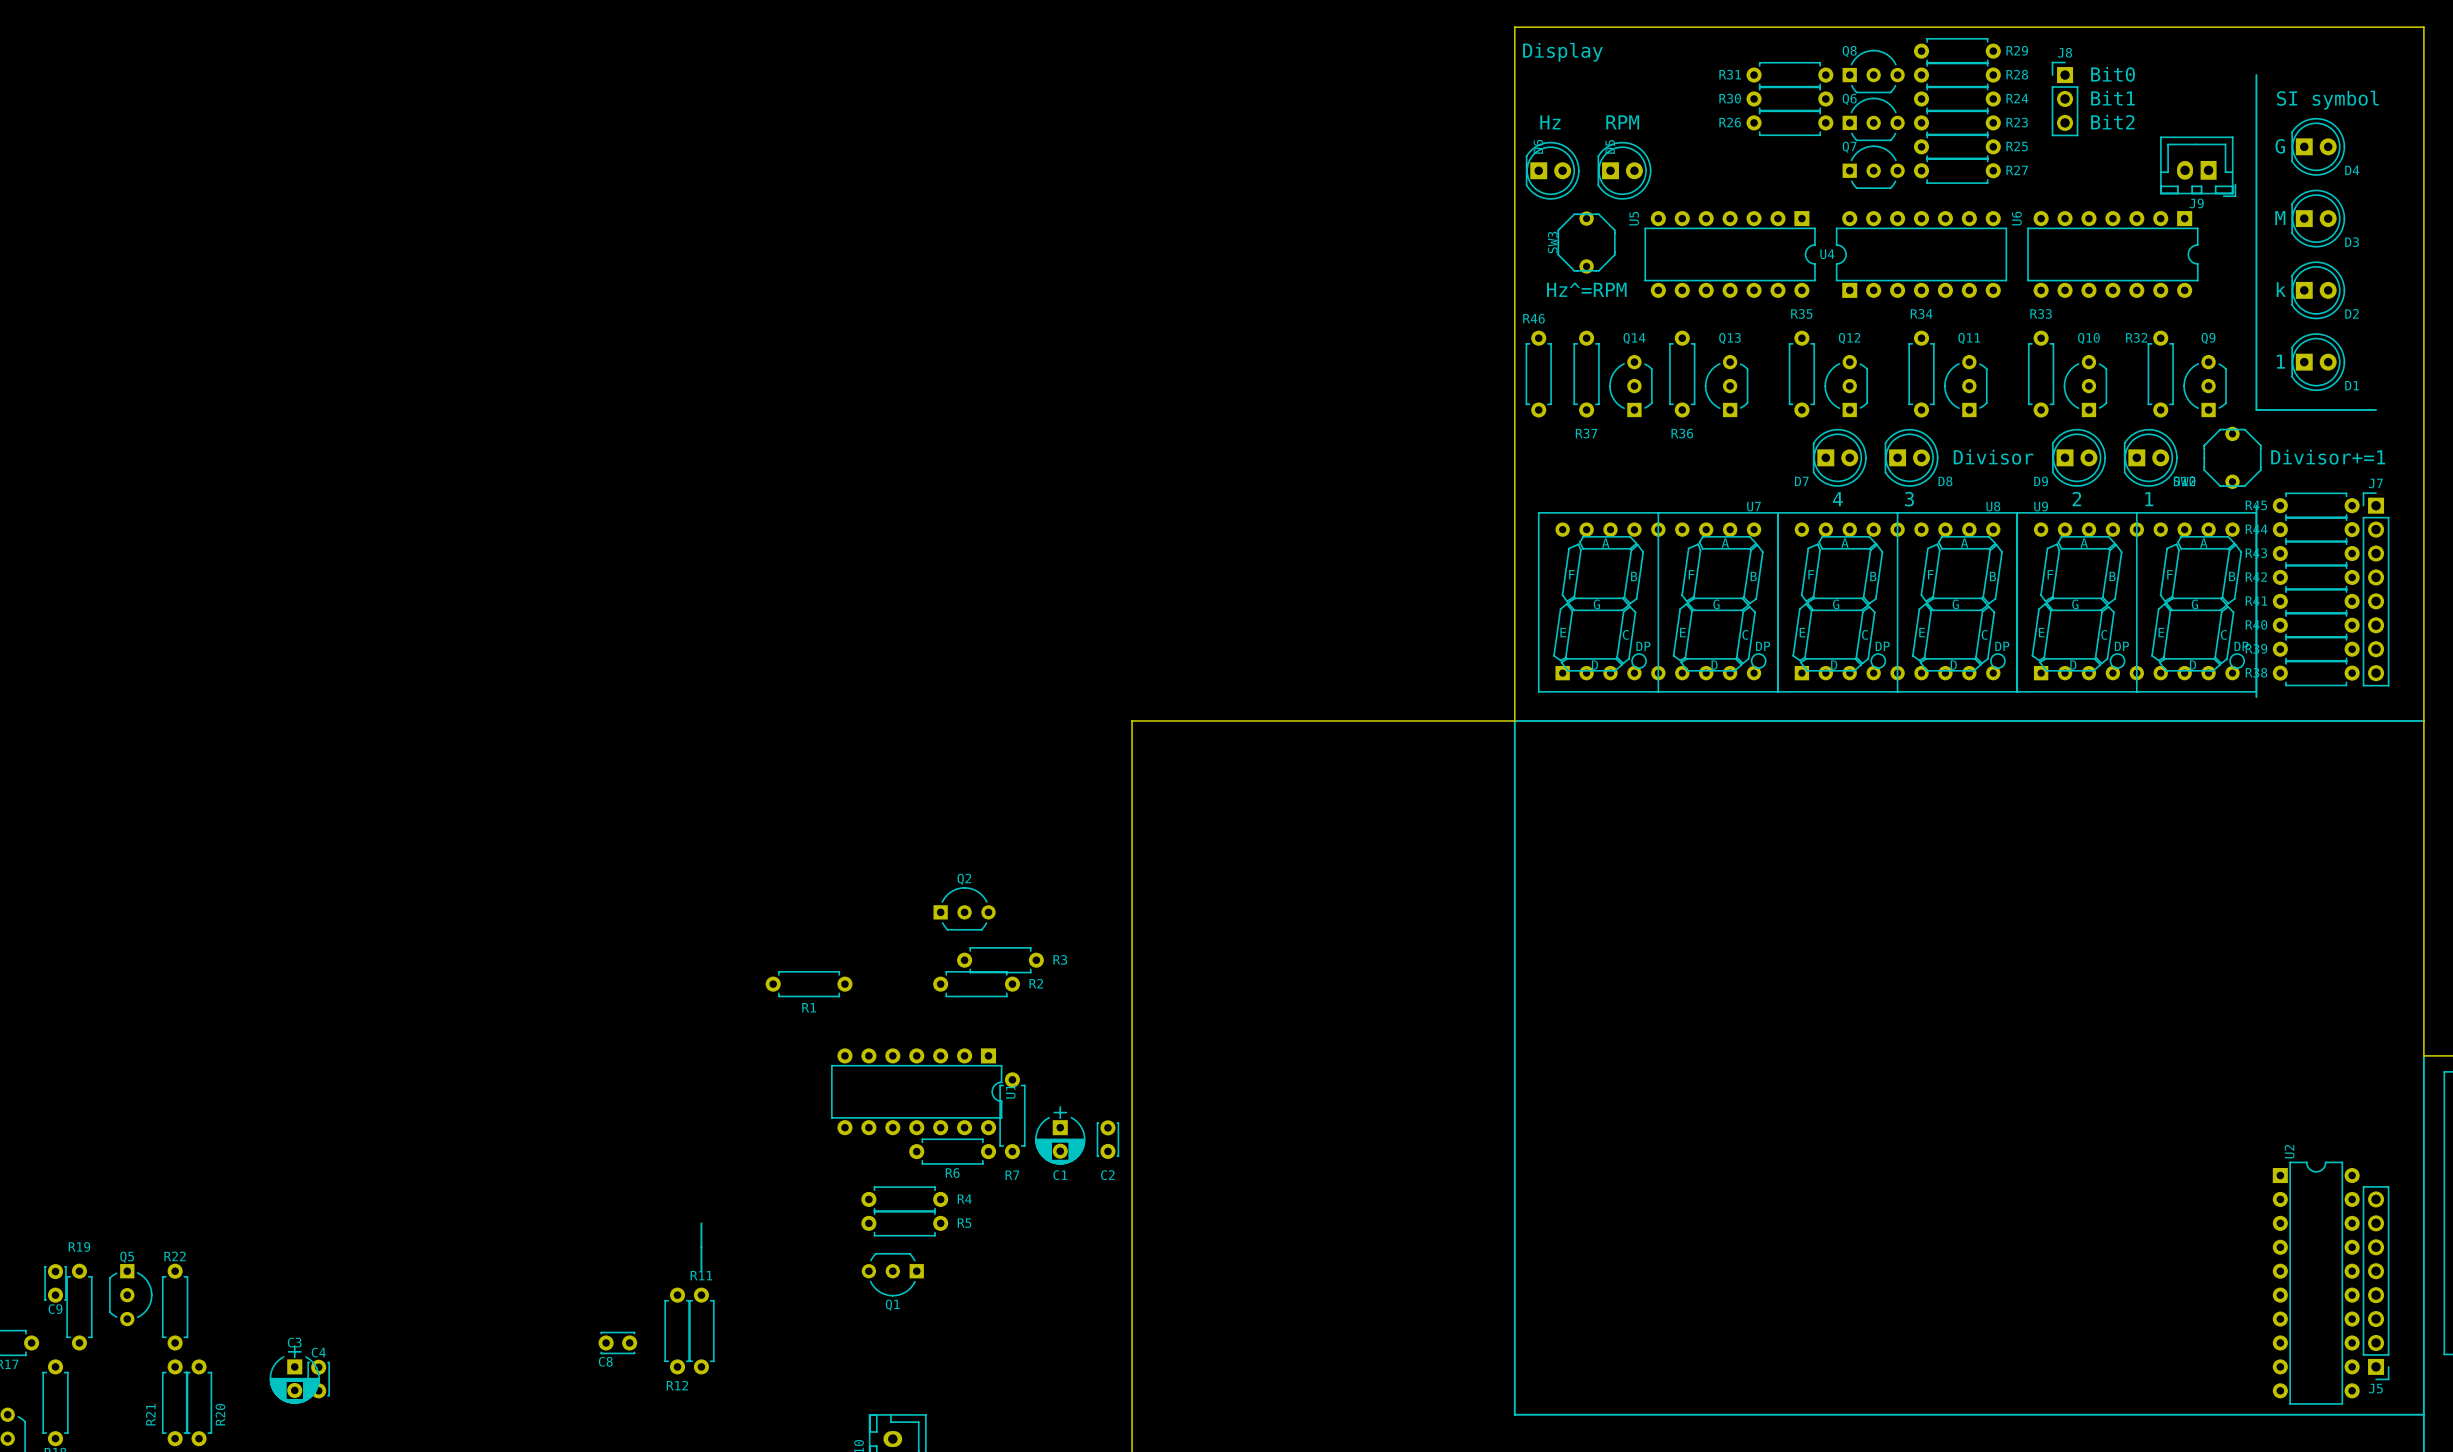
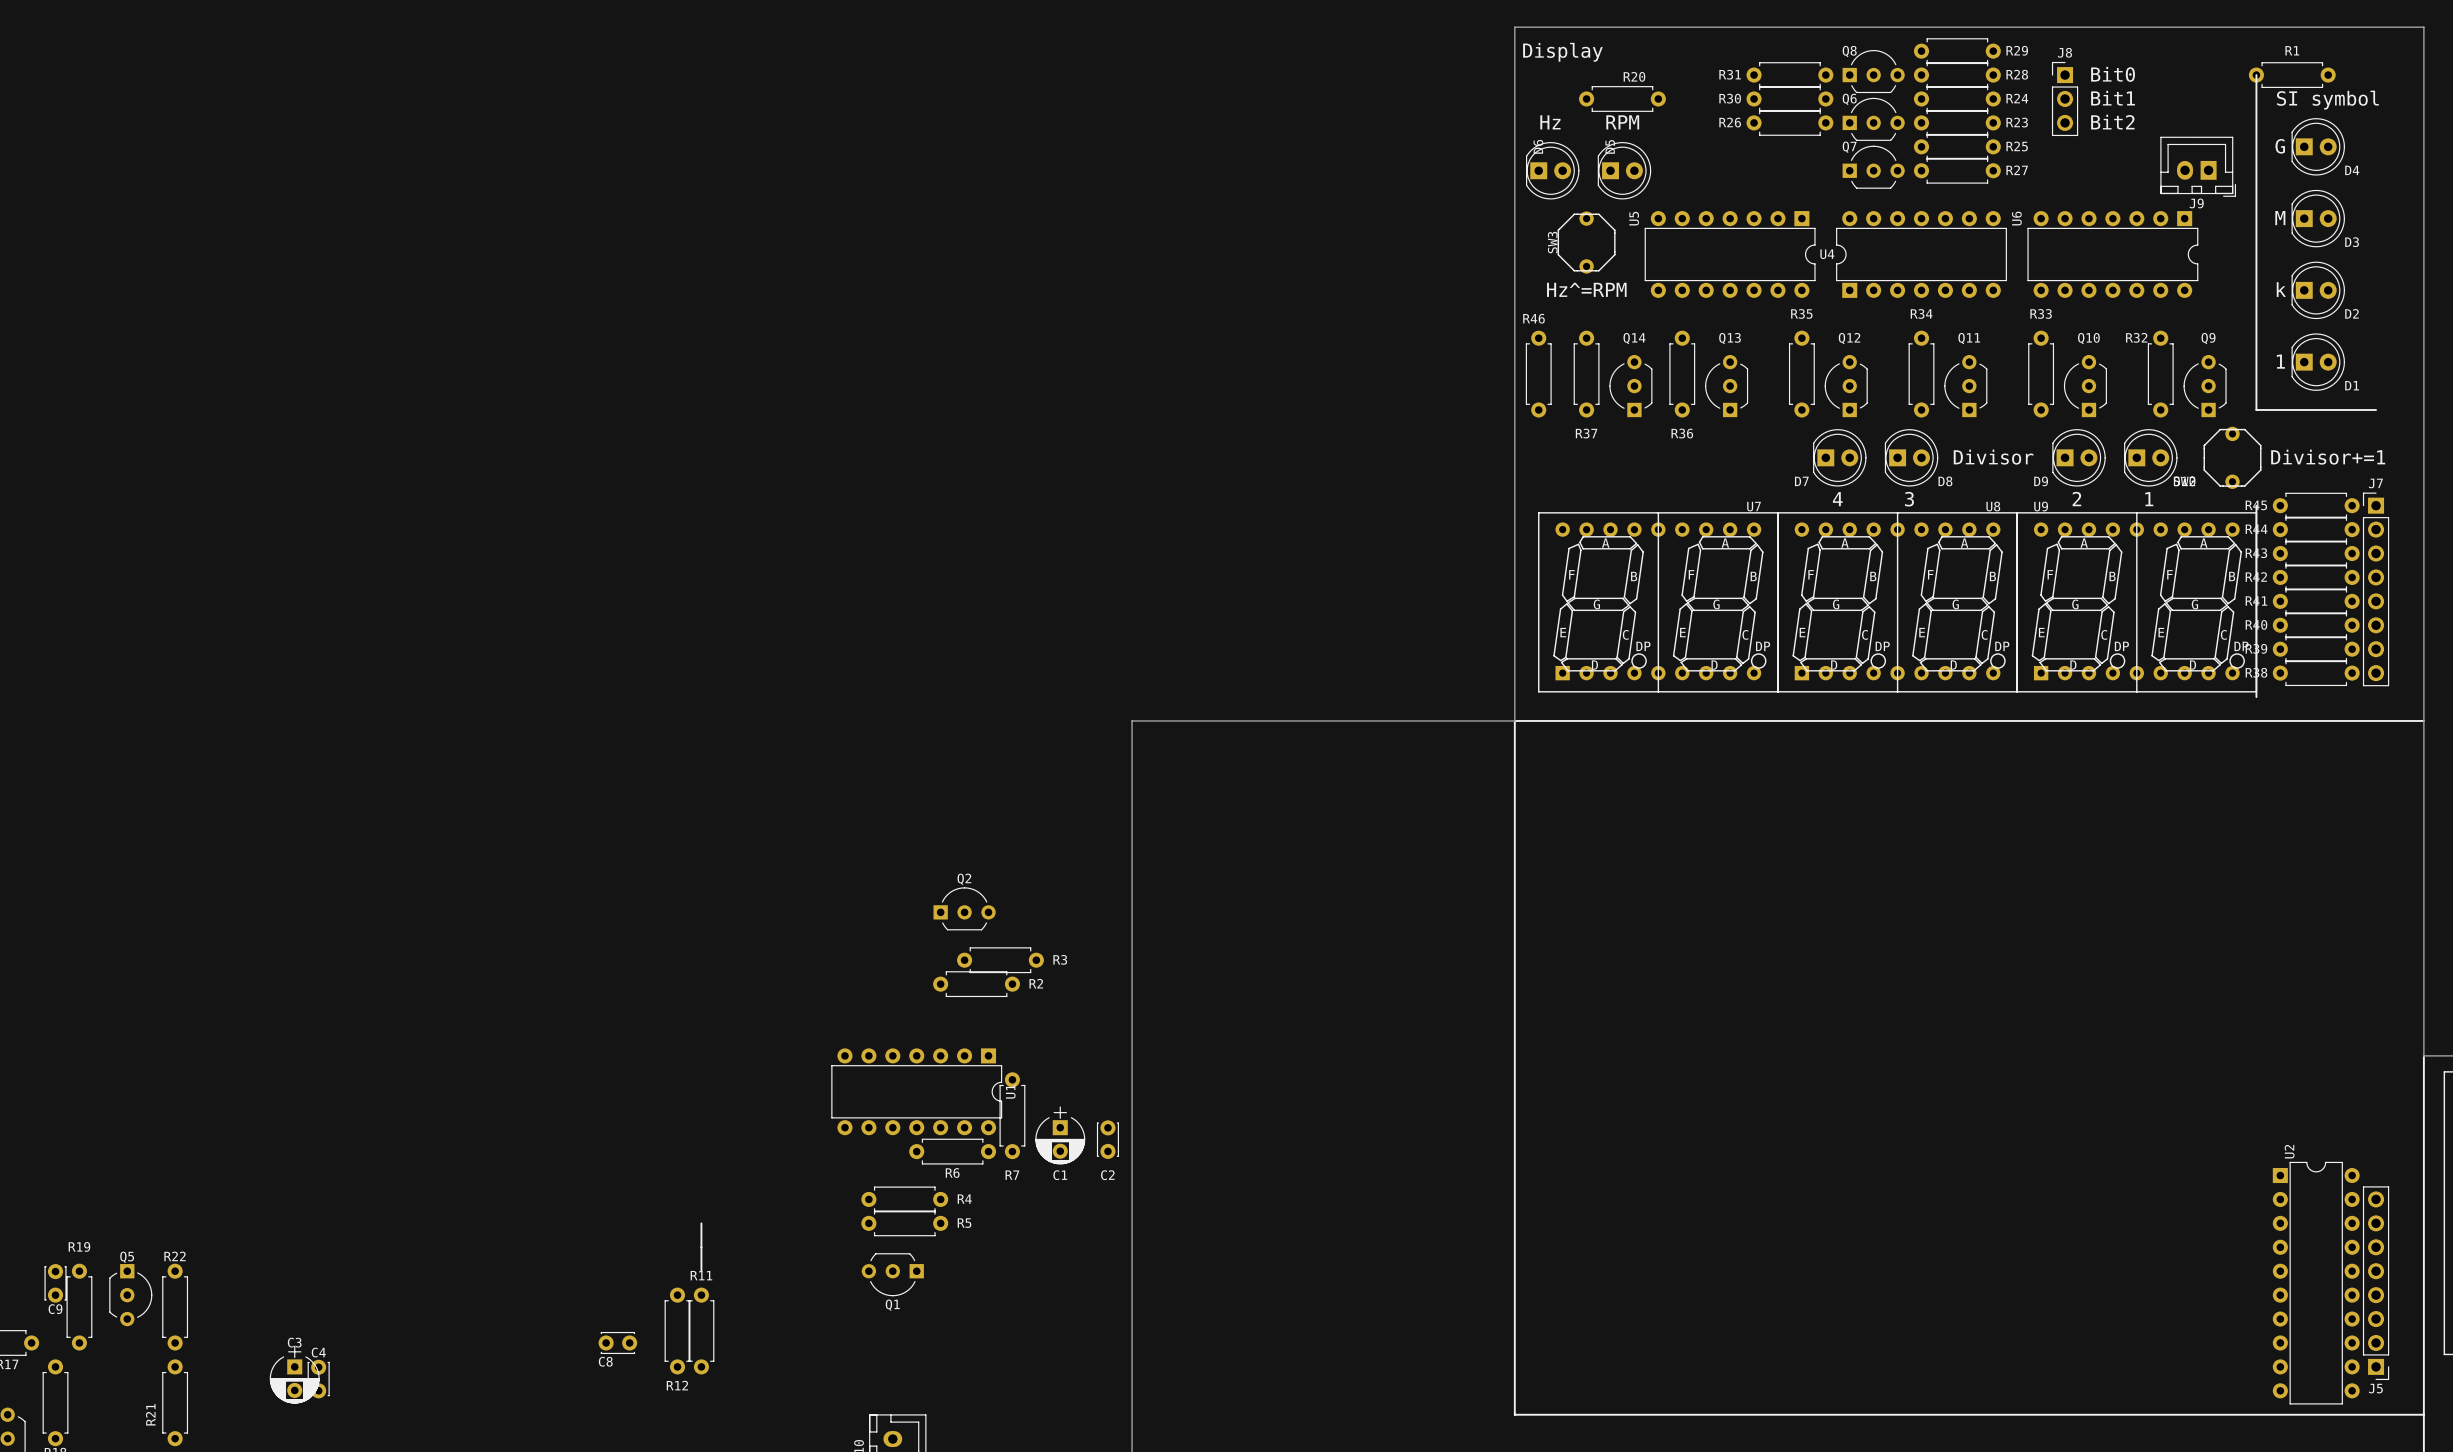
R1 position: (809, 984) -> (2292, 75)
R1 name position: R1 (809, 1007) -> R1 (2292, 50)
R20 rotation: 0° (199, 1402) -> 90° clockwise (1622, 98)
R20 position: (199, 1402) -> (1622, 98)
R20 name position: R20 (220, 1414) -> R20 (1634, 76)

